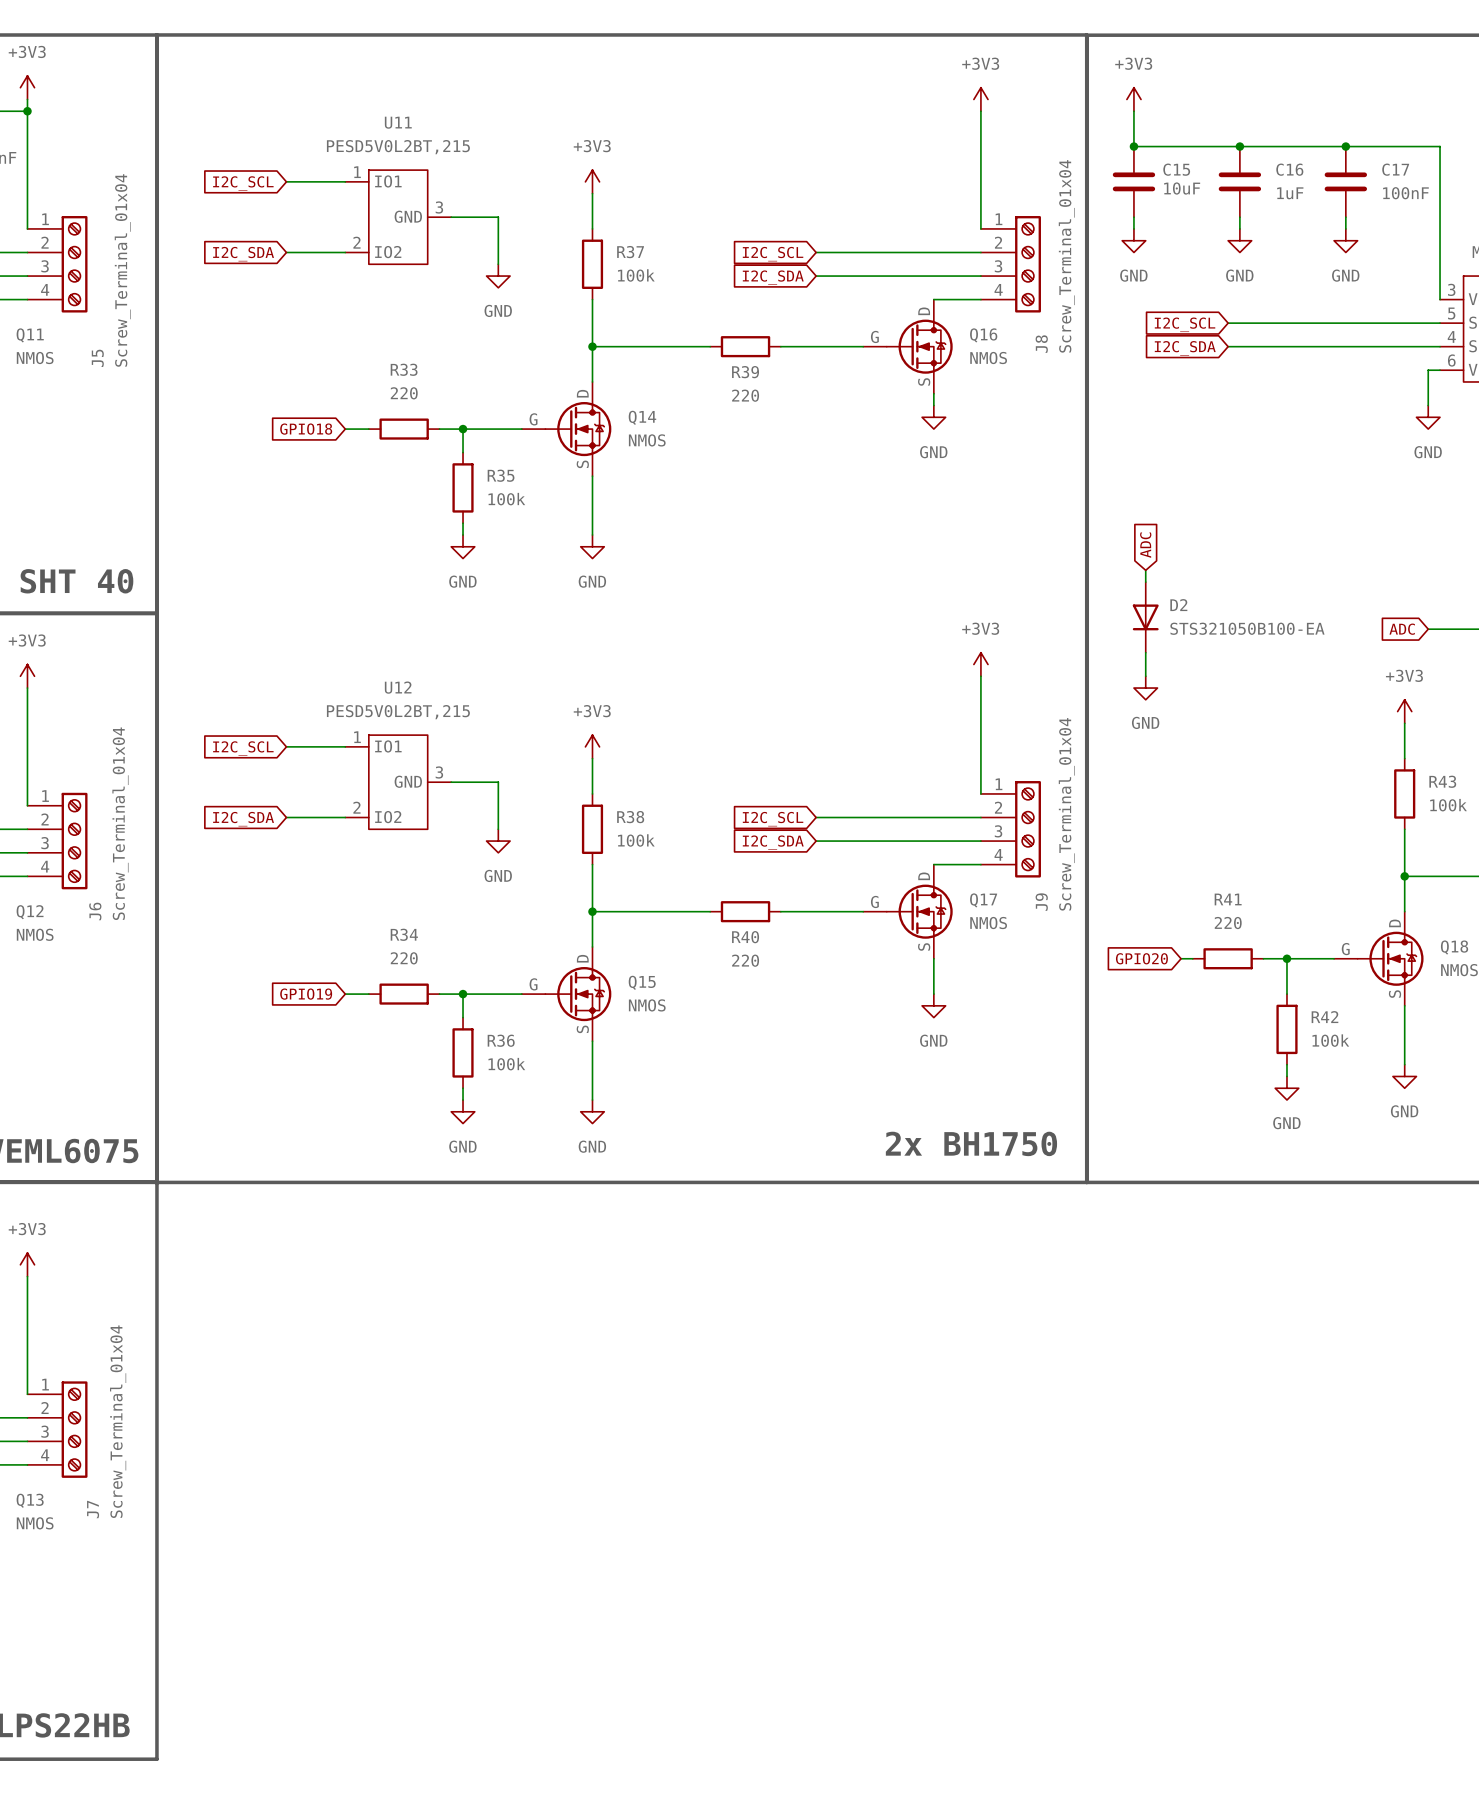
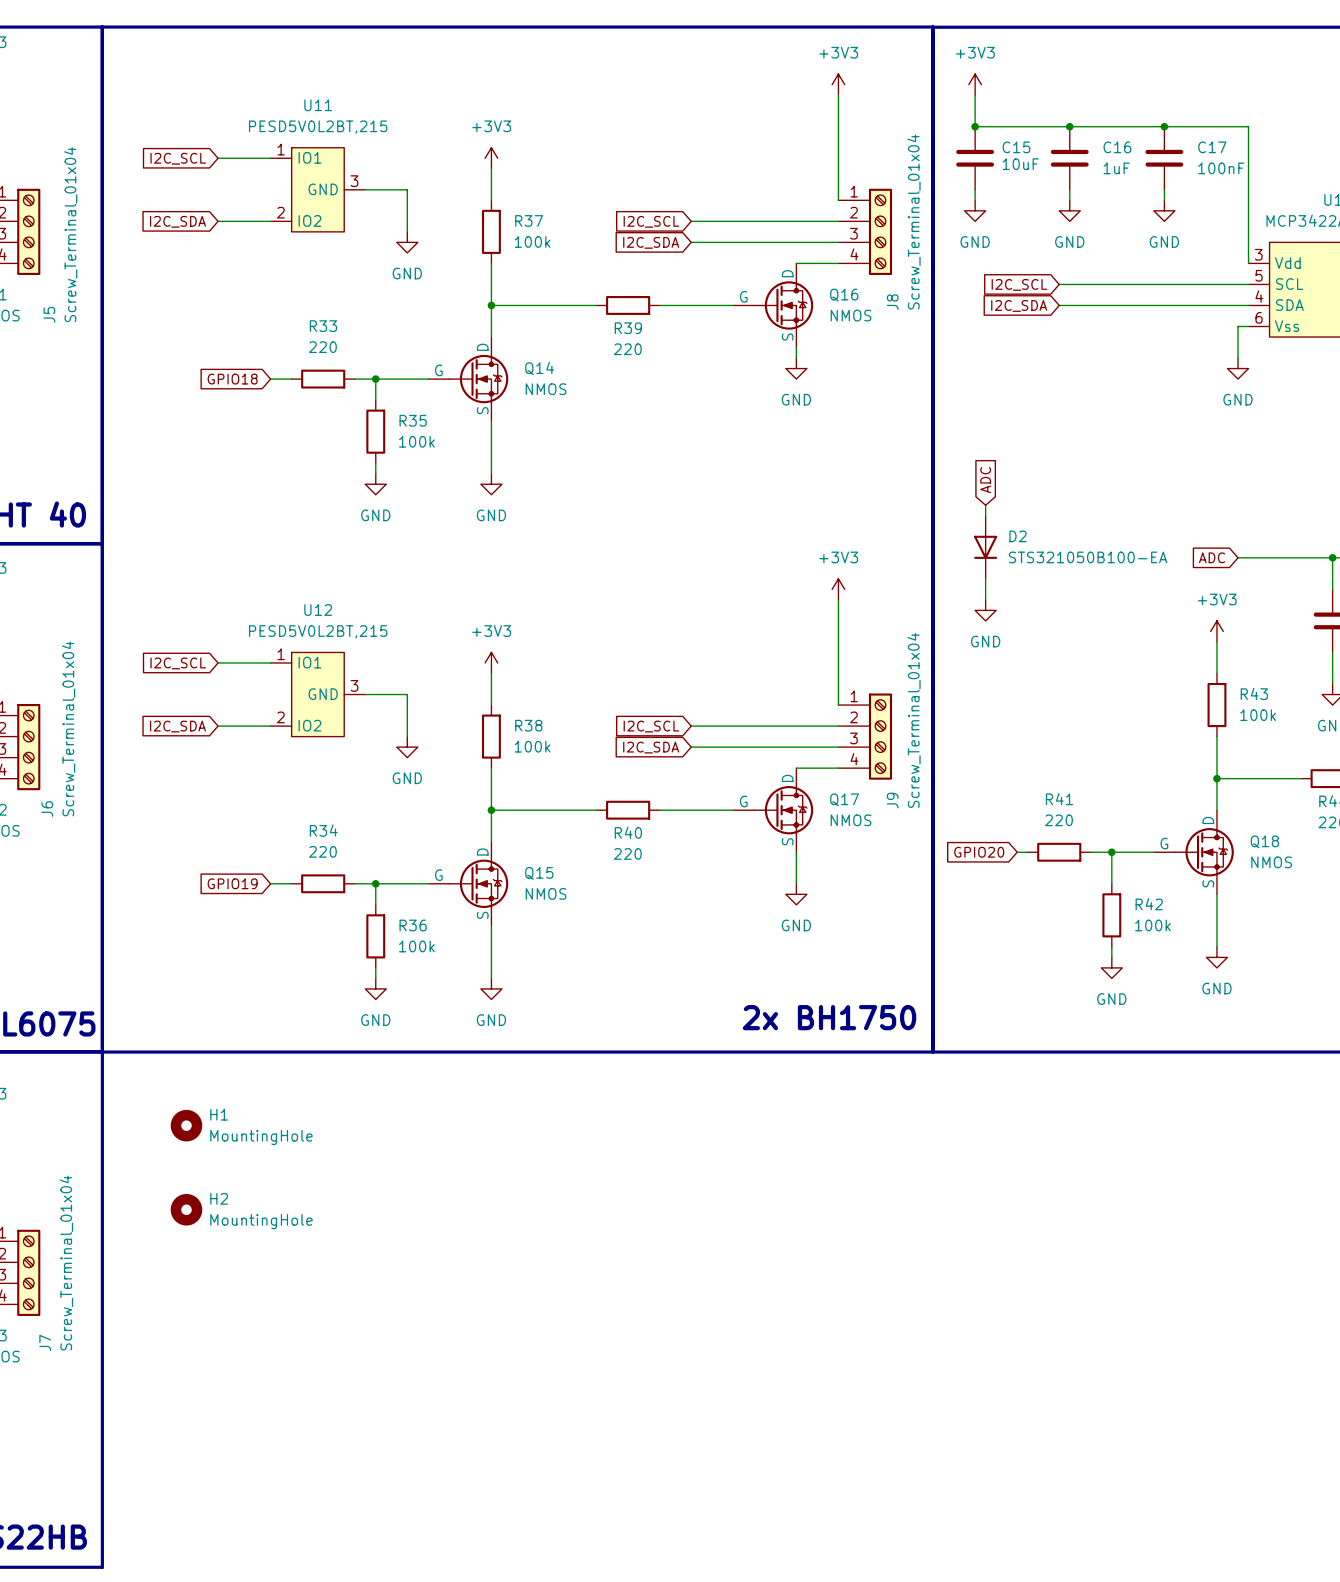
H1: none -> MountingHole (186, 1125)
H2: none -> MountingHole (186, 1209)

